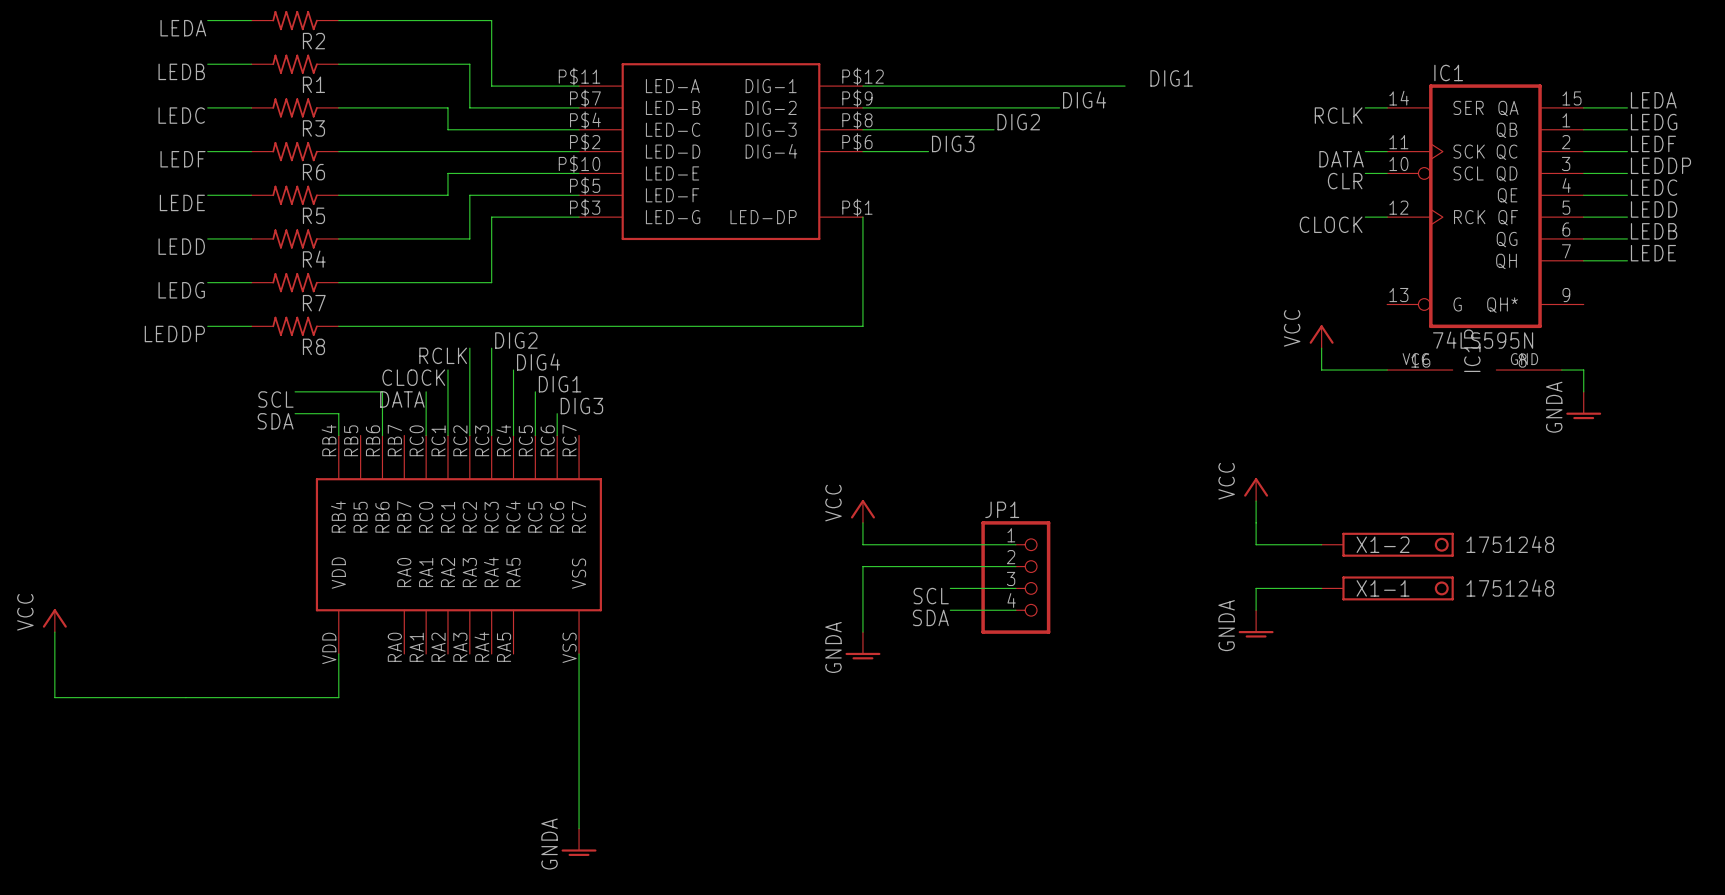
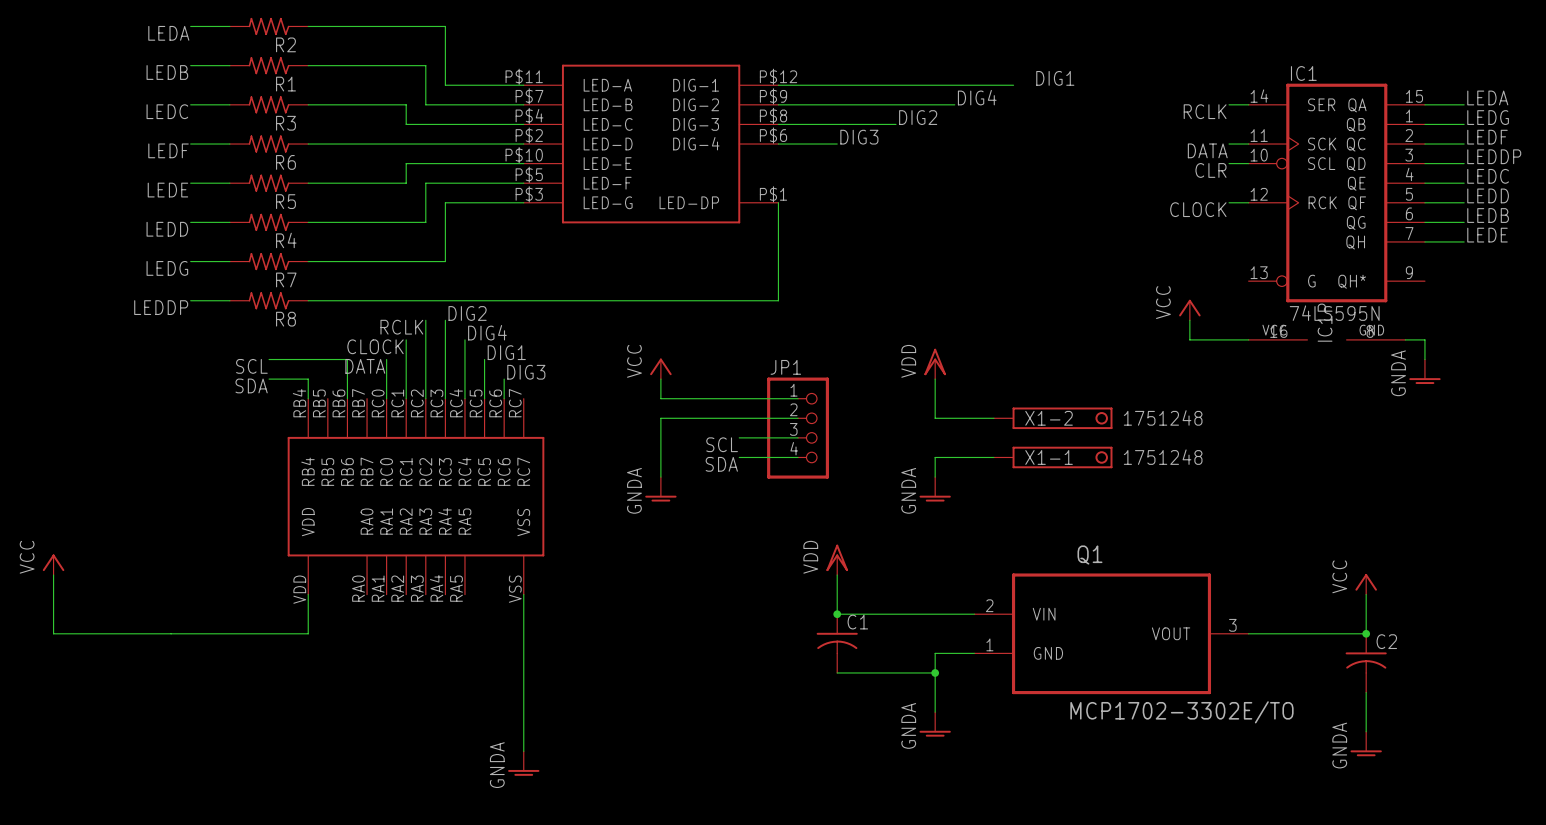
power symbol: none -> VDD (935, 363)
wire: none -> (935, 379) (935, 418) (993, 418)
power symbol: VCC (1256, 489) -> none
wire: none -> (993, 457) (935, 457) (935, 477)
wire: (1256, 501) (1256, 544) (1321, 544) -> none
power symbol position: VCC (862, 511) -> VCC (660, 368)
wire: (862, 522) (862, 544) (1015, 544) -> (660, 379) (660, 398) (798, 398)
power symbol: none -> GNDA (660, 489)
power symbol: none -> GNDA (935, 489)
X1-2 position: (1387, 544) -> (1053, 418)
wire: (1015, 566) (862, 566) (862, 632) -> (798, 418) (660, 418) (660, 477)
JP1 position: (1015, 577) -> (798, 428)
wire: (950, 588) (1015, 588) -> (739, 437) (798, 437)
wire: (1321, 588) (1256, 588) (1256, 610) -> none
X1-1 position: (1387, 588) -> (1053, 457)
label position: SCL (931, 596) -> SCL (722, 444)
wire: (950, 610) (1015, 610) -> (739, 457) (798, 457)
power symbol: none -> VDD (837, 559)
label position: SDA (930, 617) -> SDA (721, 464)
power symbol: GNDA (1256, 623) -> none
wire: none -> (837, 575) (837, 614) (974, 614)
power symbol: none -> VCC (1366, 584)
power symbol: GNDA (862, 645) -> none
wire: none -> (1366, 594) (1366, 633) (1248, 633)
junction: none -> (837, 614)
Q1: none -> MCP1702-3302E/TO (1111, 633)
junction: none -> (1366, 633)
C1: none -> (837, 643)
wire: none -> (974, 653) (935, 653) (935, 712)
C2: none -> (1366, 663)
wire: none -> (837, 672) (935, 672)
junction: none -> (935, 672)
wire: none -> (1366, 692) (1366, 731)
power symbol: none -> GNDA (935, 724)
power symbol: none -> GNDA (1366, 744)

